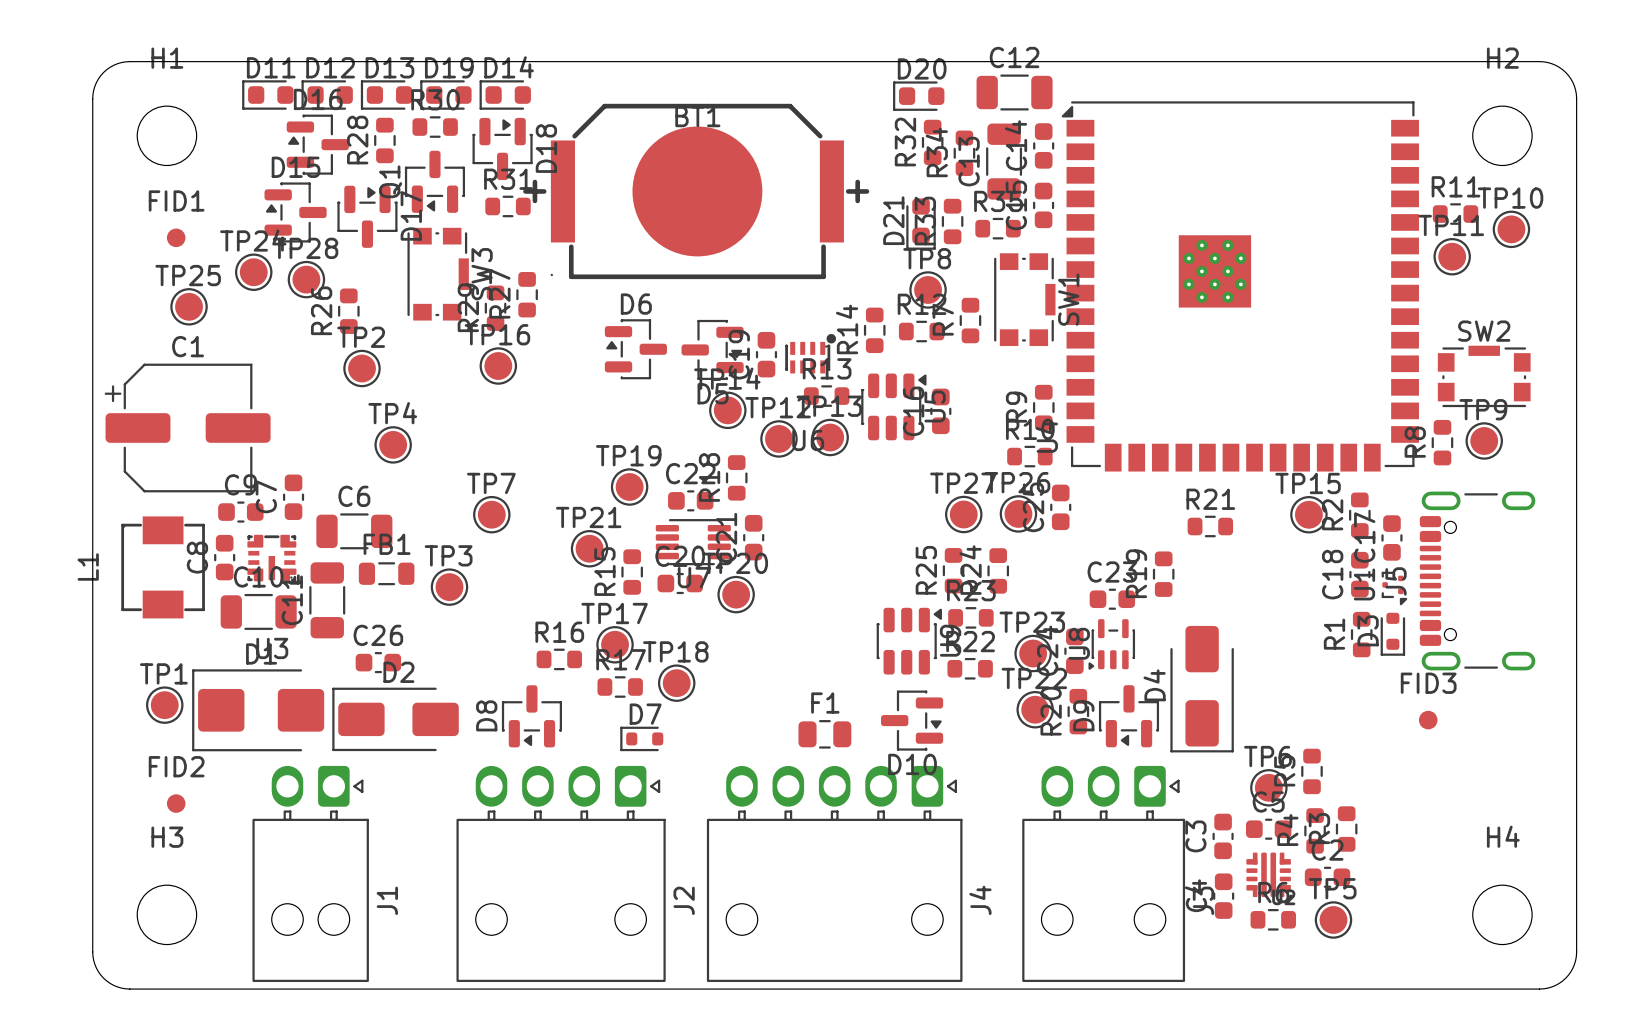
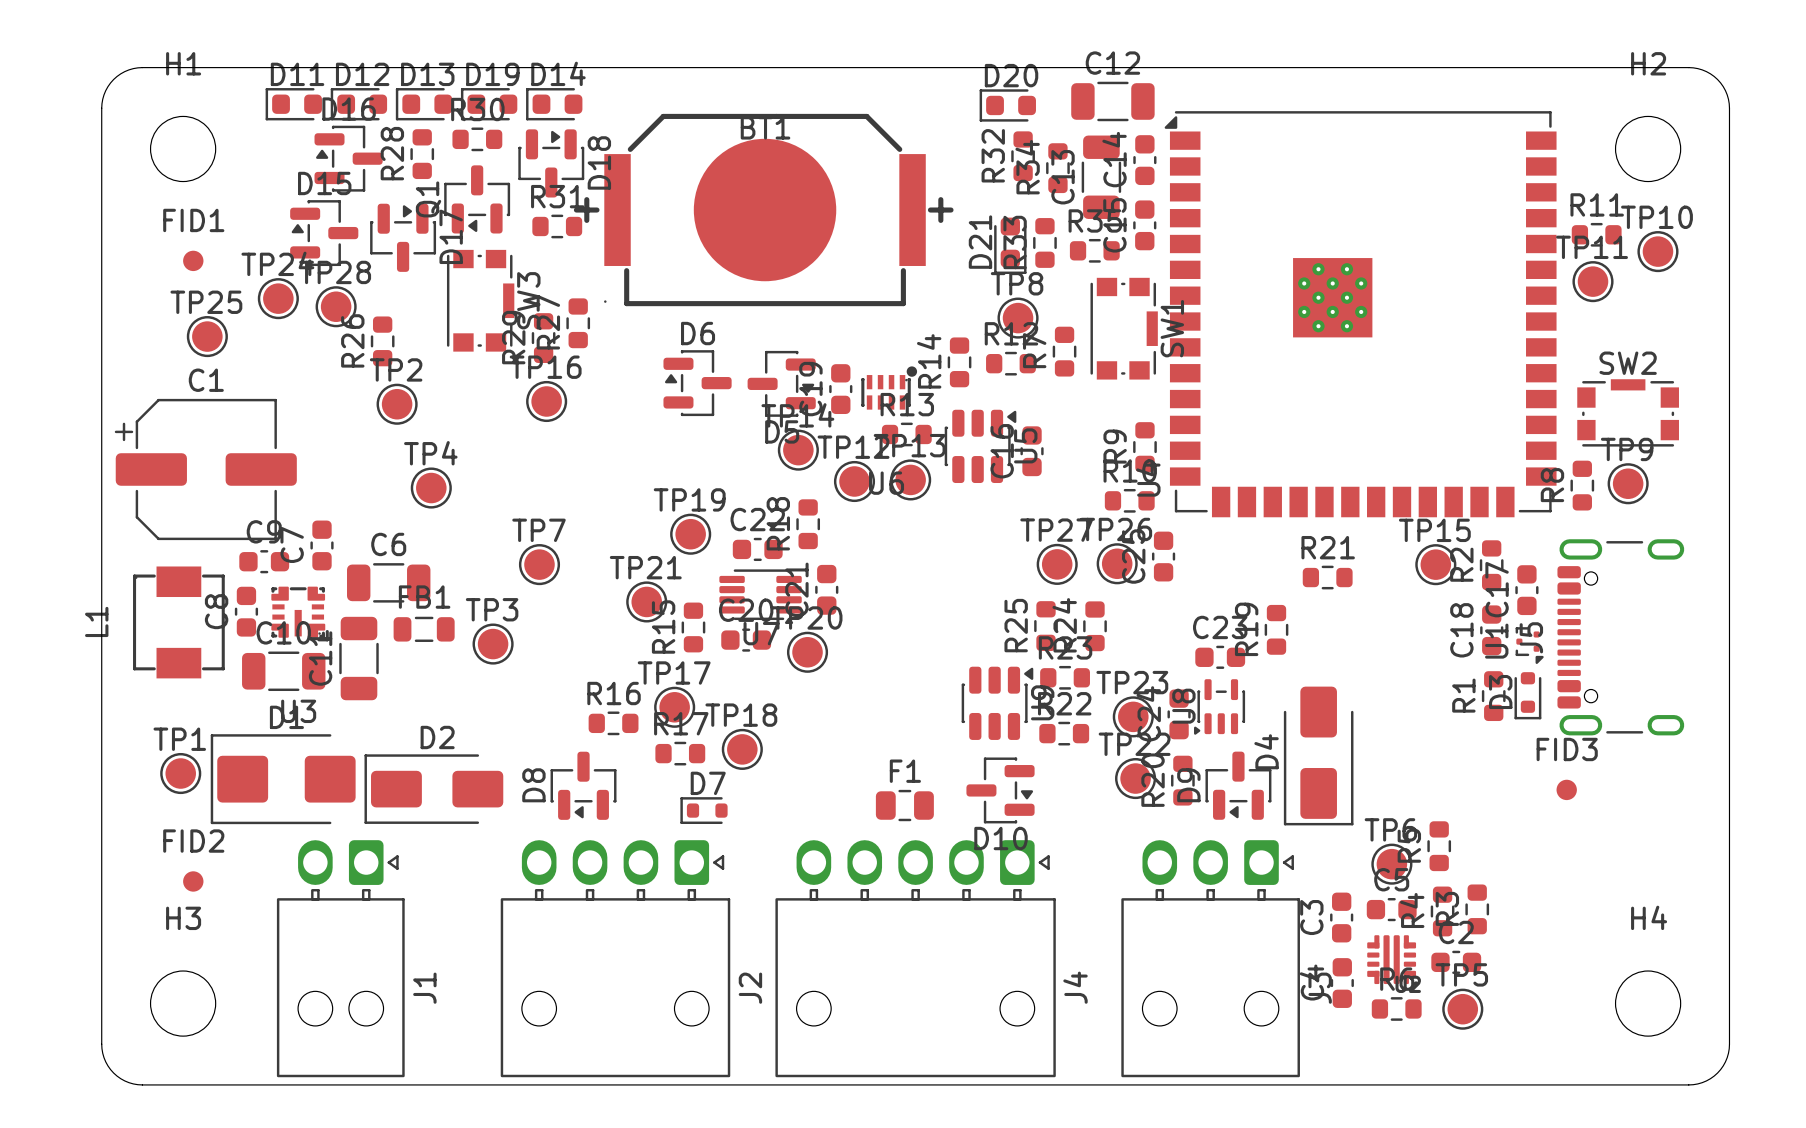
C26: (378, 662) -> none

